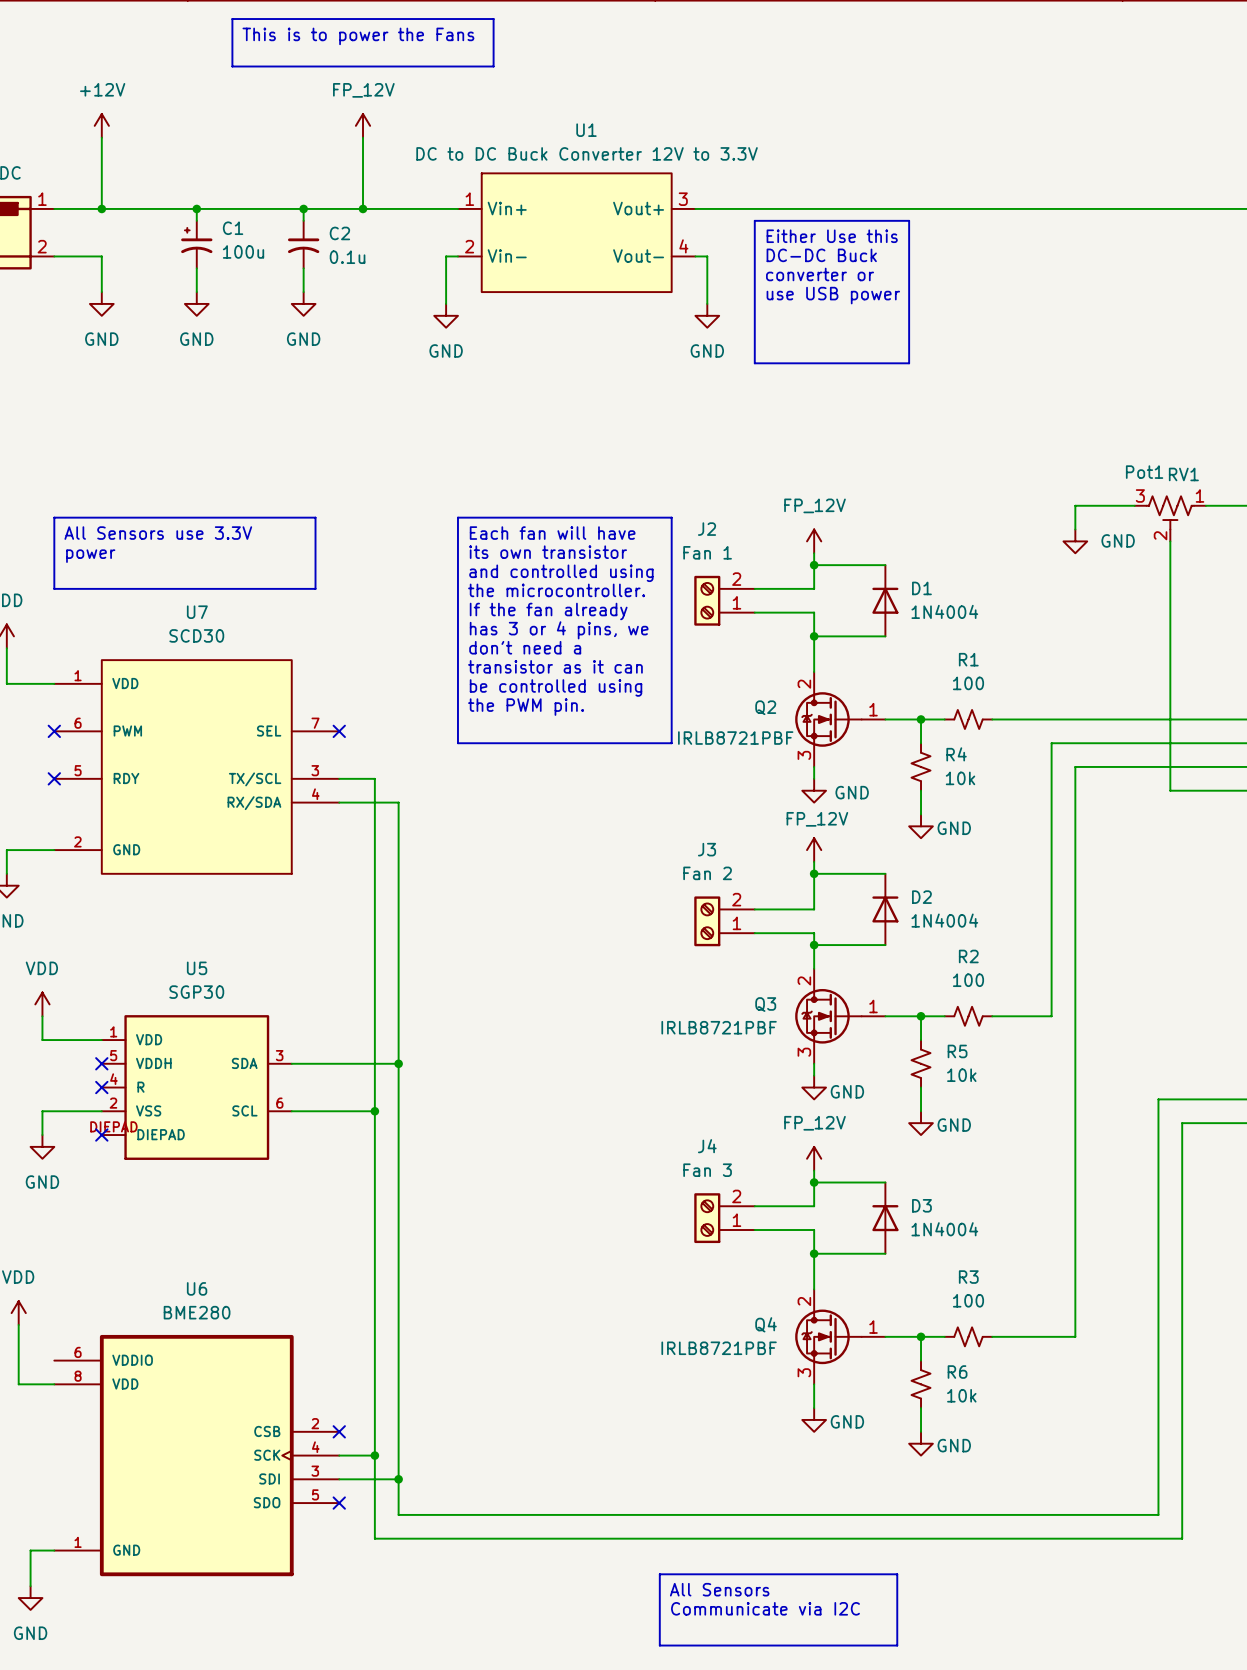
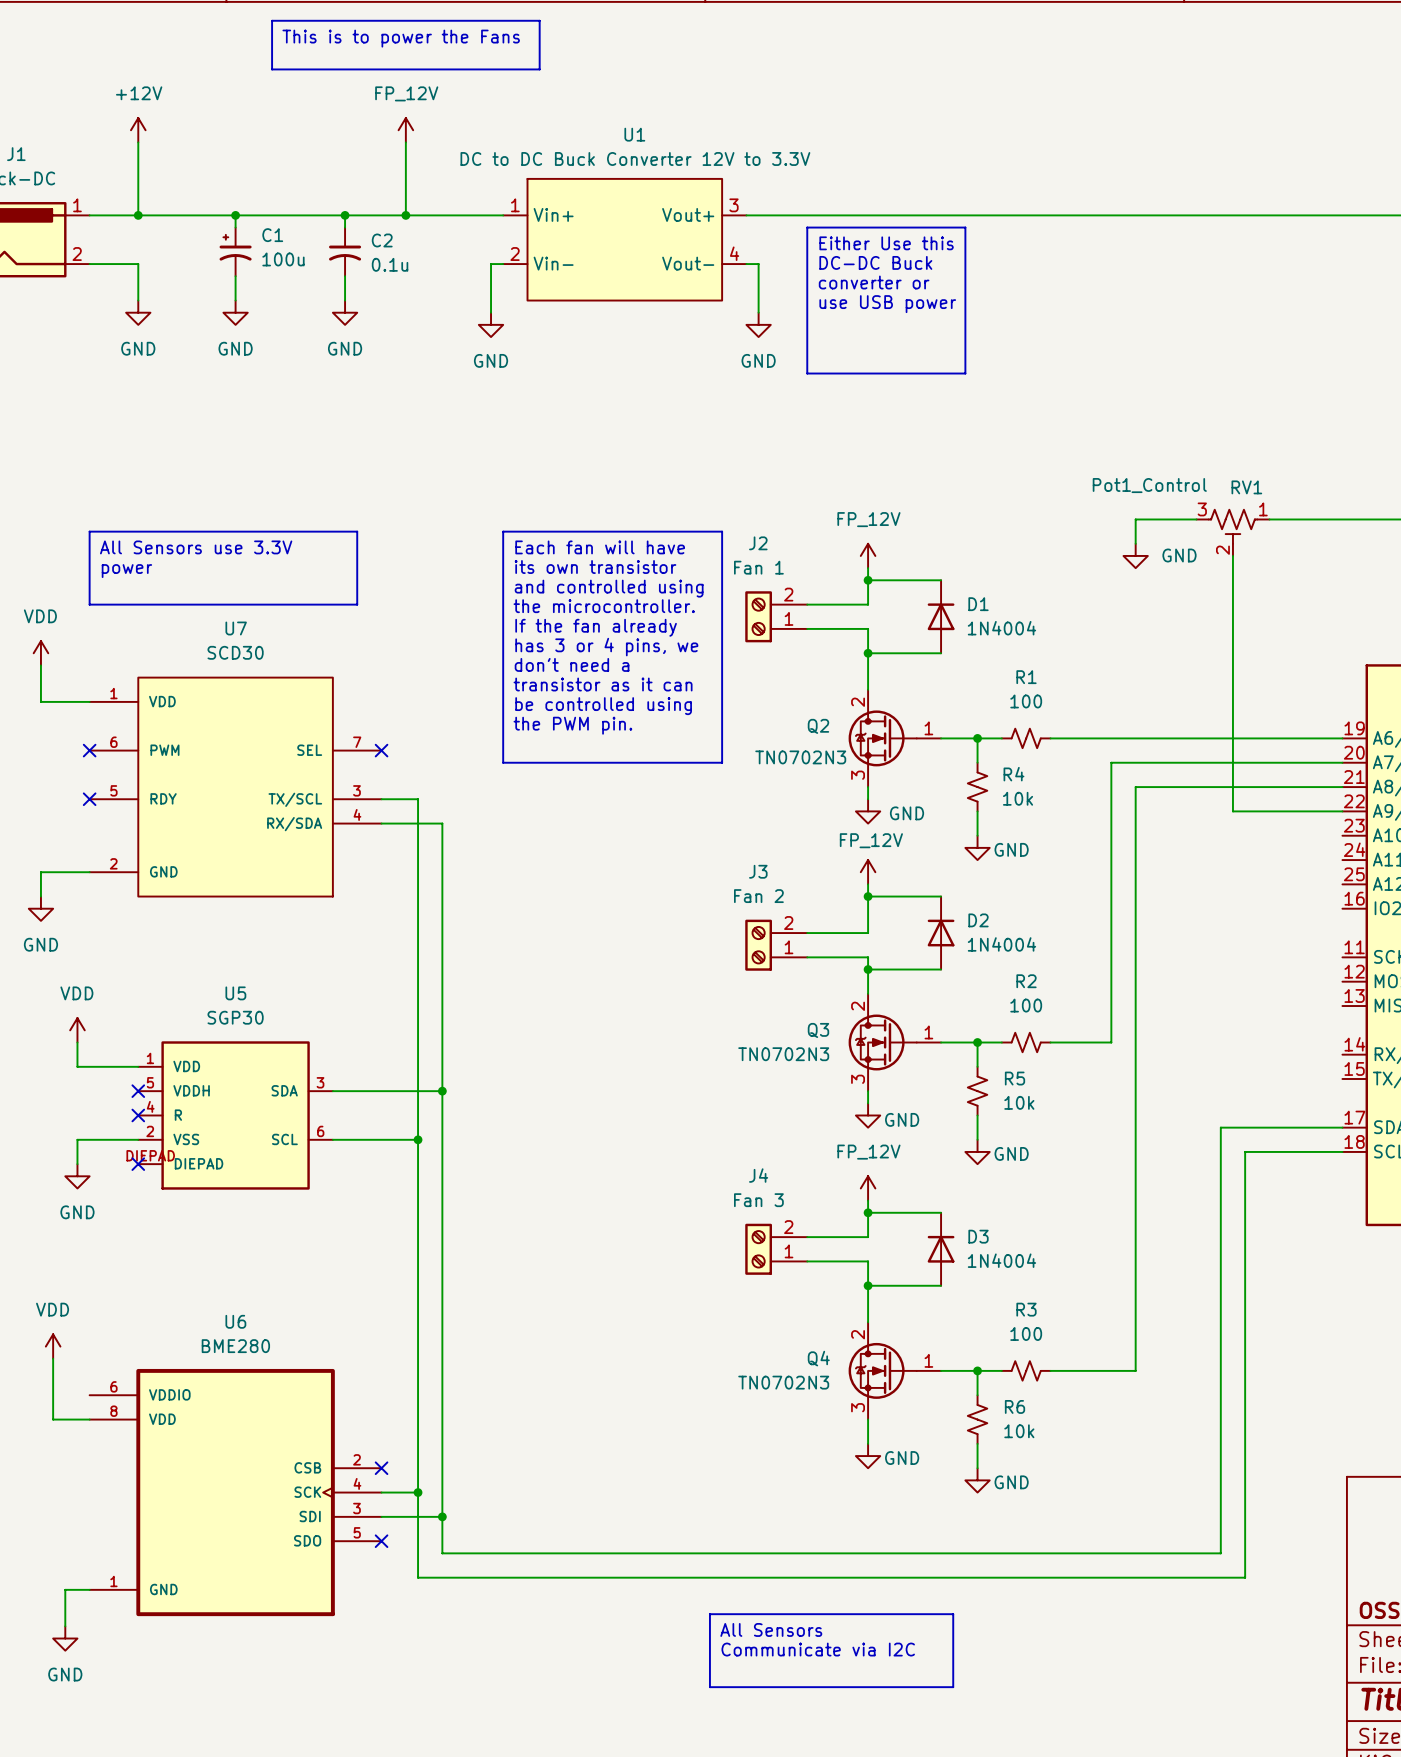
RV1 value: Pot1 (1144, 472) -> Pot1_Control (1149, 485)
Q2 value: IRLB8721PBF (735, 738) -> TN0702N3 (800, 757)
Q3 value: IRLB8721PBF (719, 1027) -> TN0702N3 (783, 1054)
Q4 value: IRLB8721PBF (719, 1348) -> TN0702N3 (783, 1382)

